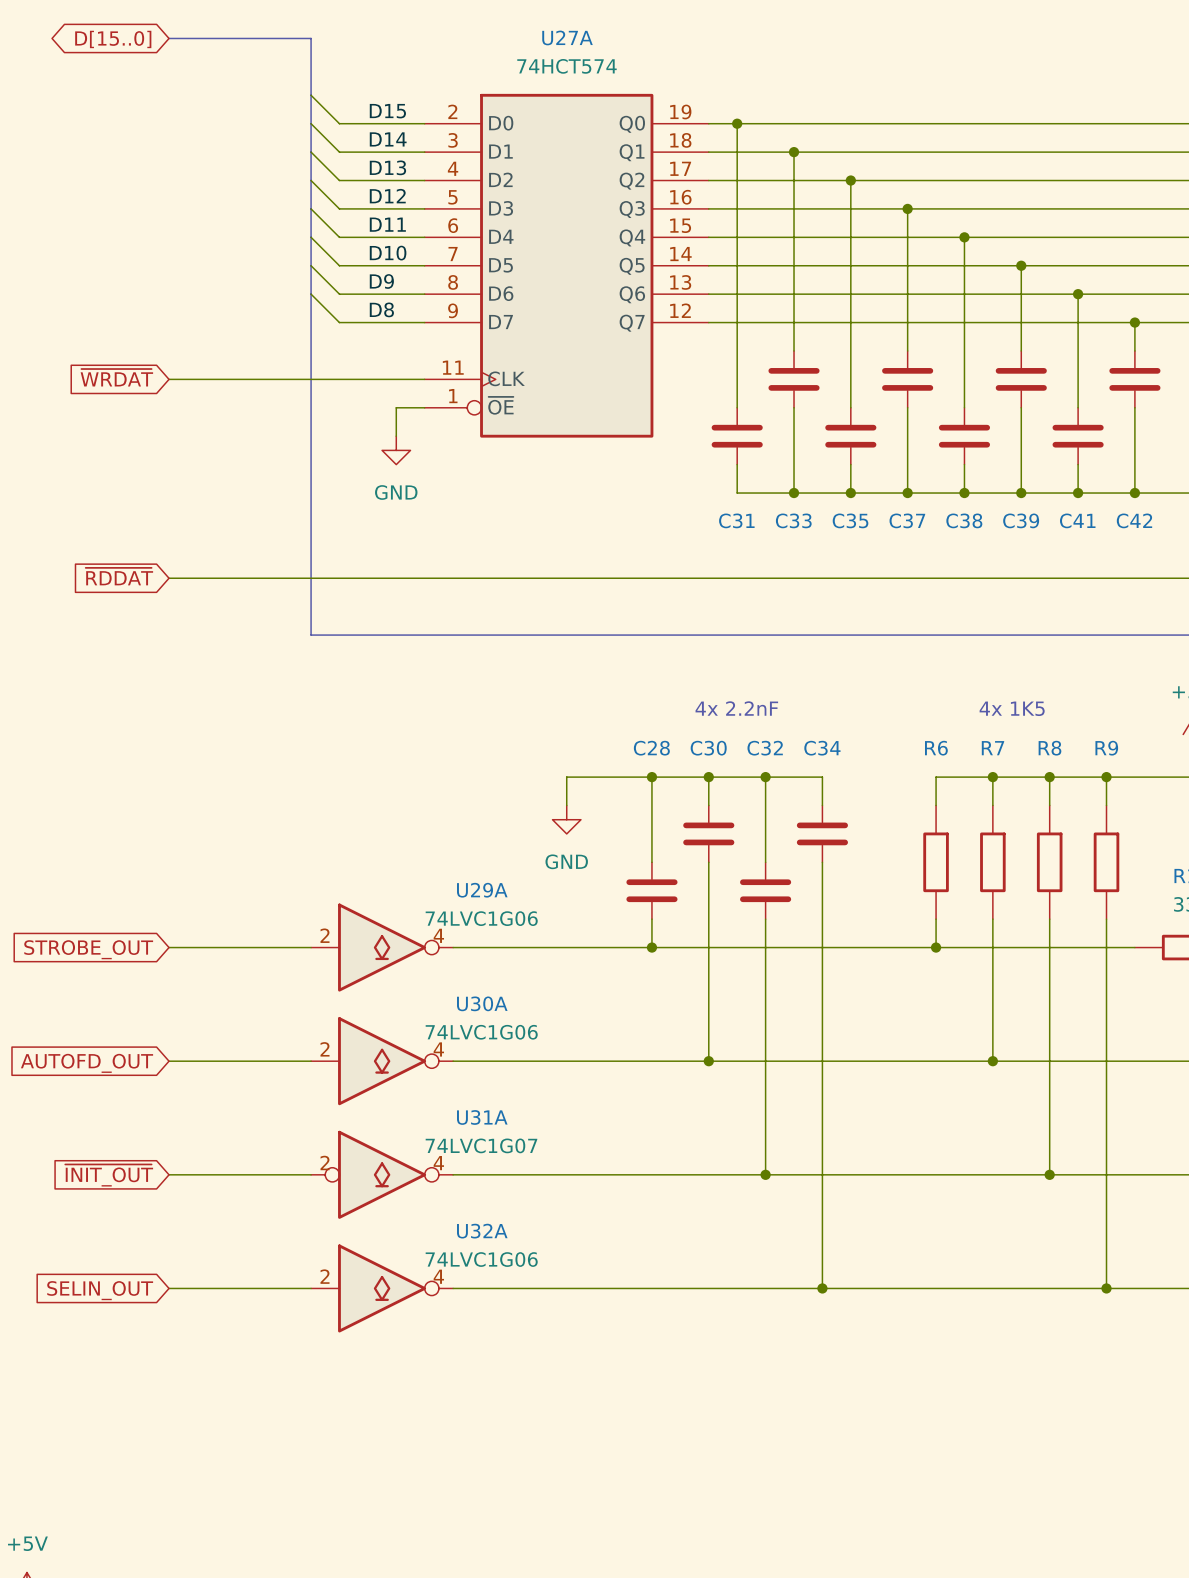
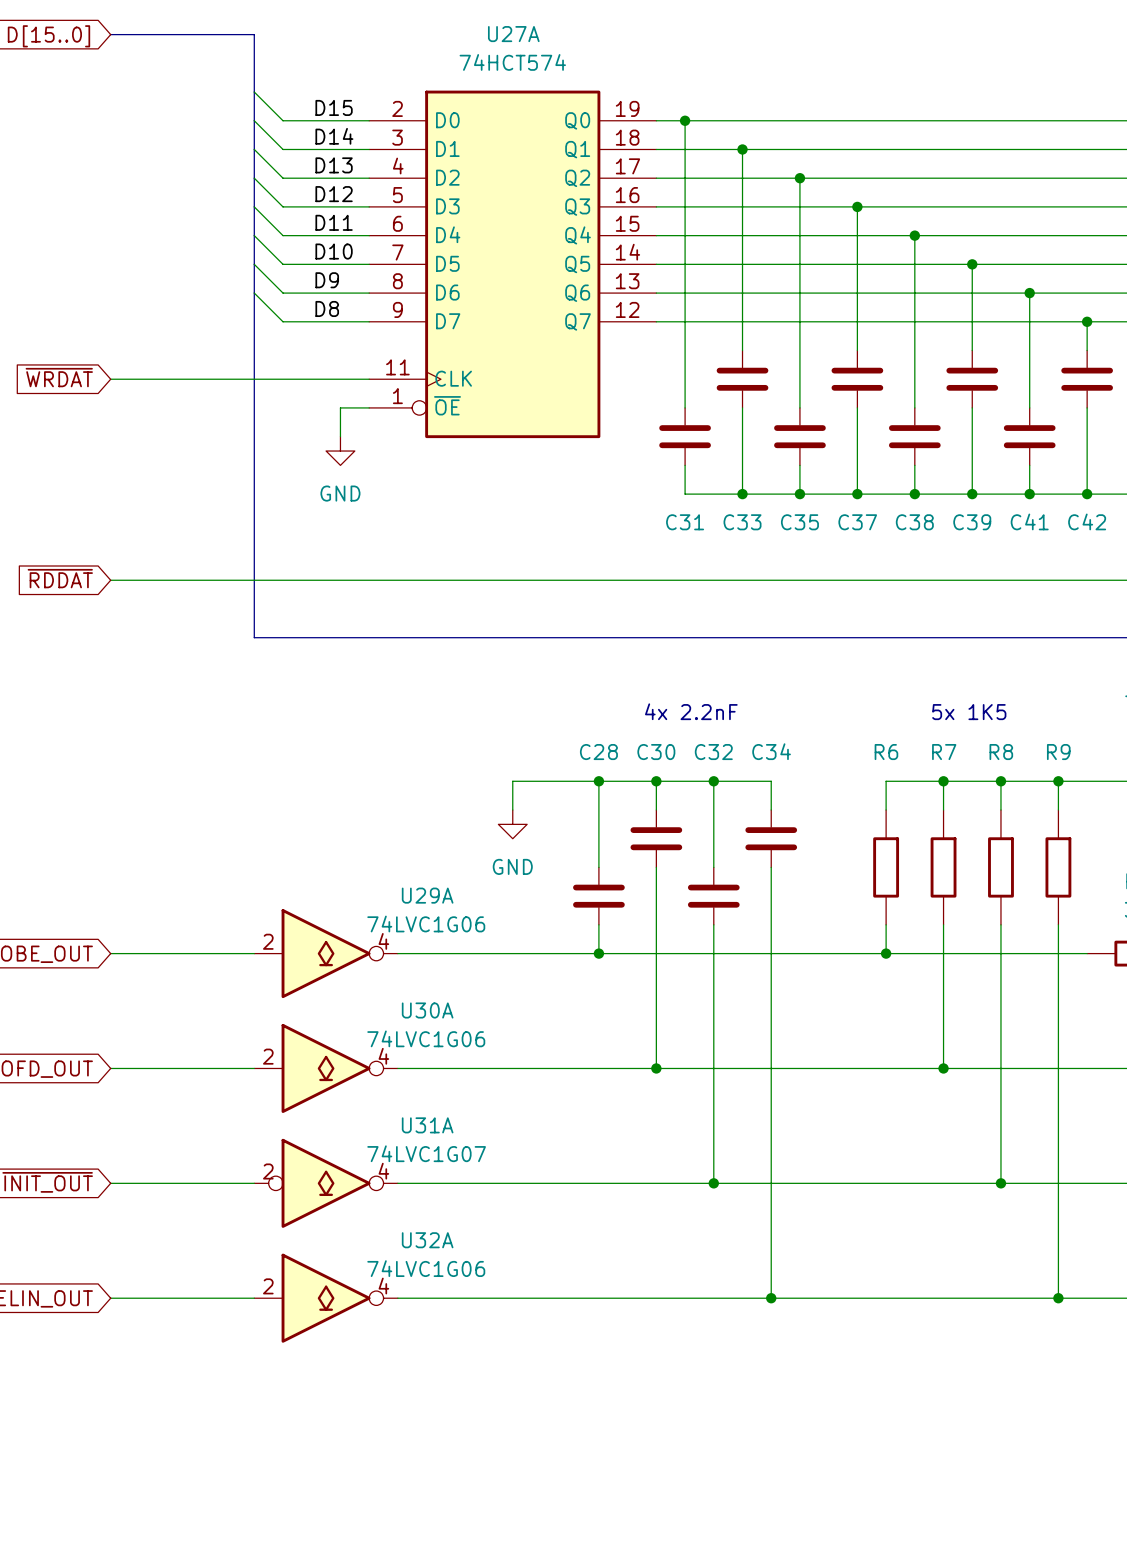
text: 4x 1K5 (1012, 708) -> 5x 1K5 (969, 712)

